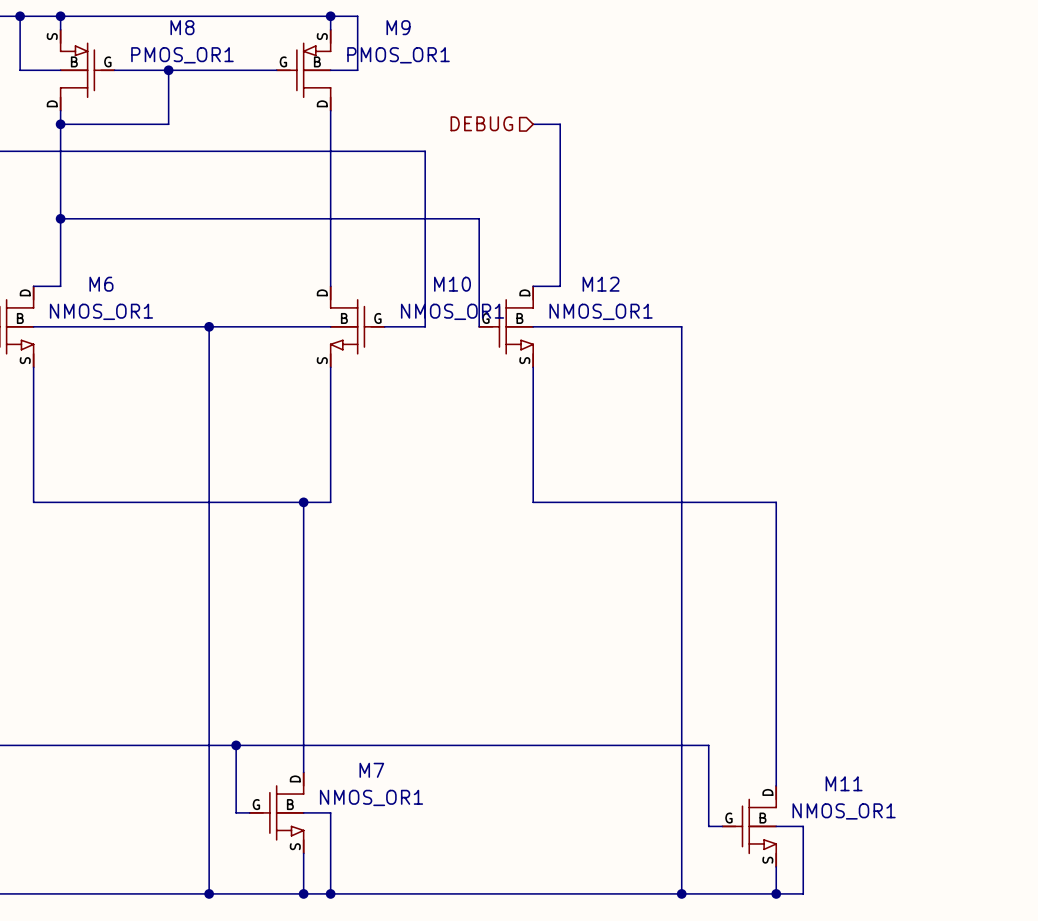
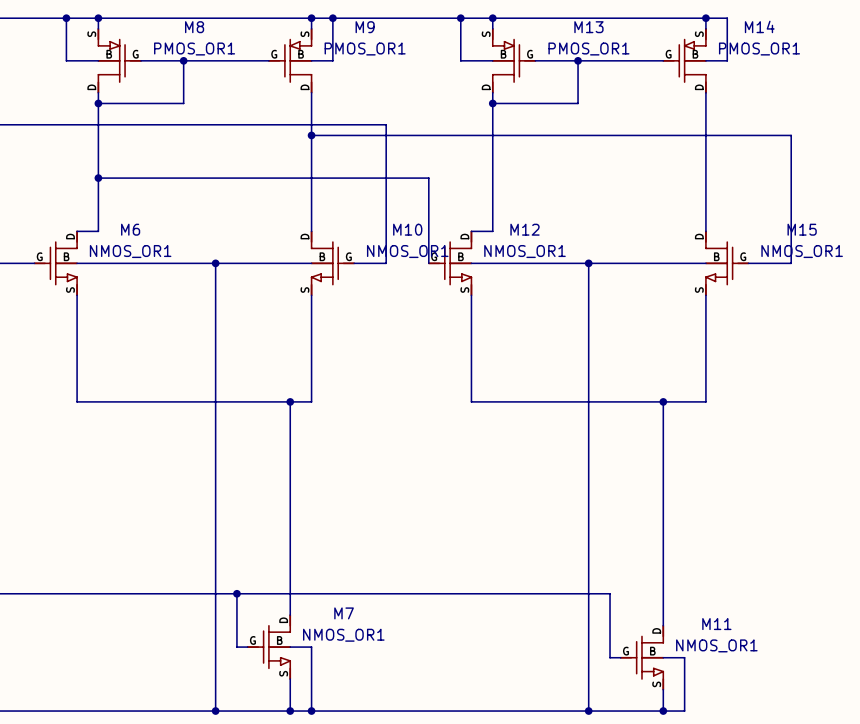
wire: none -> (332, 18) (727, 18) (727, 60) (705, 60)
junction: none -> (332, 18)
wire: none -> (460, 18) (460, 60) (492, 60)
junction: none -> (460, 18)
wire: none -> (492, 18) (492, 28)
junction: none -> (492, 18)
wire: none -> (705, 18) (705, 28)
junction: none -> (705, 18)
M13: none -> PMOS_OR1 (514, 60)
wire: none -> (535, 60) (663, 60)
wire: none -> (578, 60) (578, 103) (492, 103) (492, 92)
junction: none -> (578, 60)
M14: none -> PMOS_OR1 (684, 60)
wire: none -> (705, 92) (705, 231)
hierarchical label: DEBUG (481, 123) -> none
wire: (533, 124) (560, 124) -> none
junction: none -> (492, 103)
wire: none -> (311, 135) (791, 135) (791, 263) (748, 263)
junction: none -> (311, 135)
wire: none -> (588, 263) (705, 263)
junction: none -> (588, 263)
M15: none -> NMOS_OR1 (727, 263)
wire: none -> (705, 295) (705, 401) (663, 401)
junction: none -> (663, 401)

